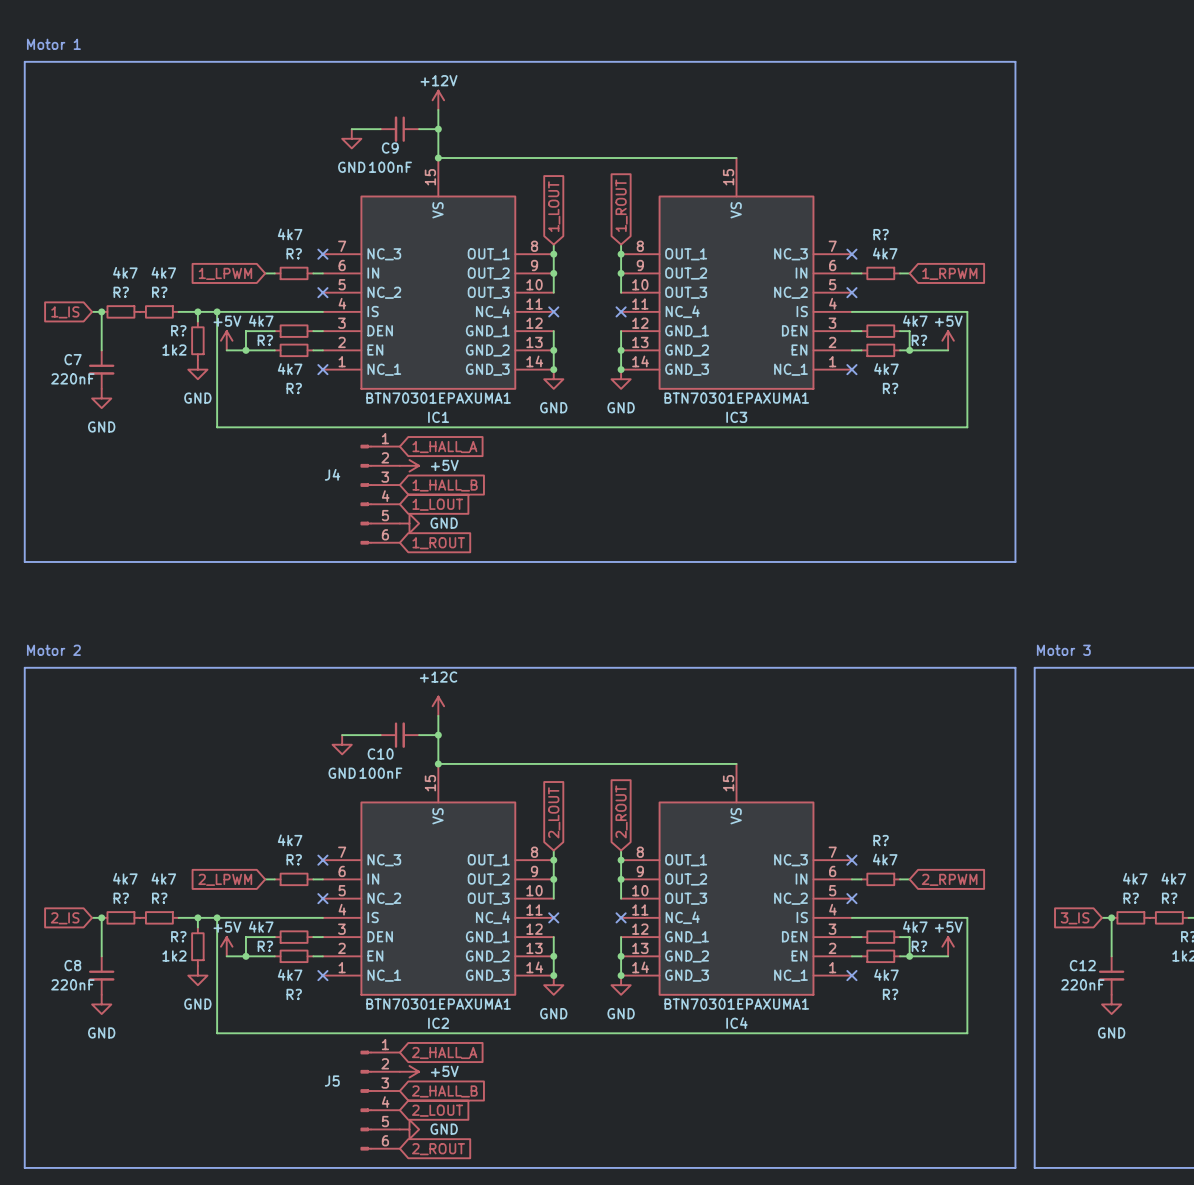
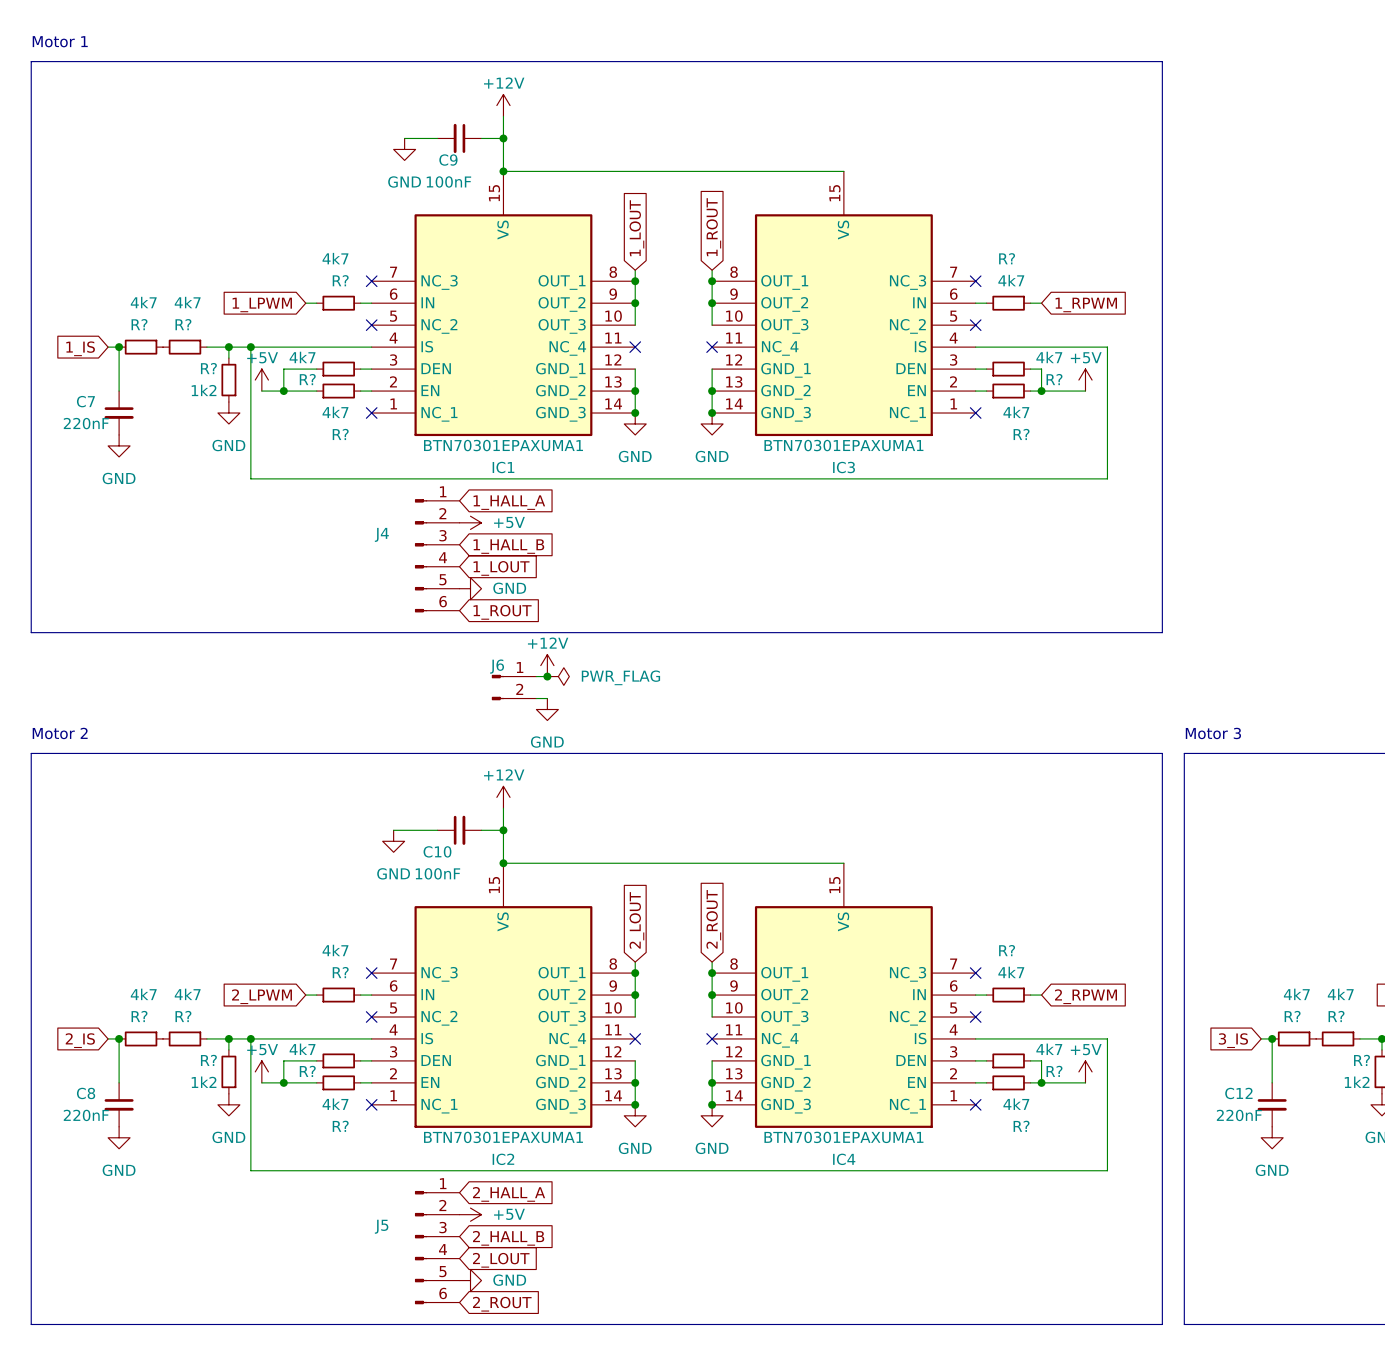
power symbol: none -> +12V (547, 665)
wire: none -> (536, 676) (547, 676)
junction: none -> (547, 676)
power symbol: none -> PWR_FLAG (558, 676)
J6: none -> (514, 687)
wire: none -> (536, 698) (547, 698)
power symbol: none -> GND (547, 709)
power symbol: +12C (438, 706) -> +12V (503, 797)

